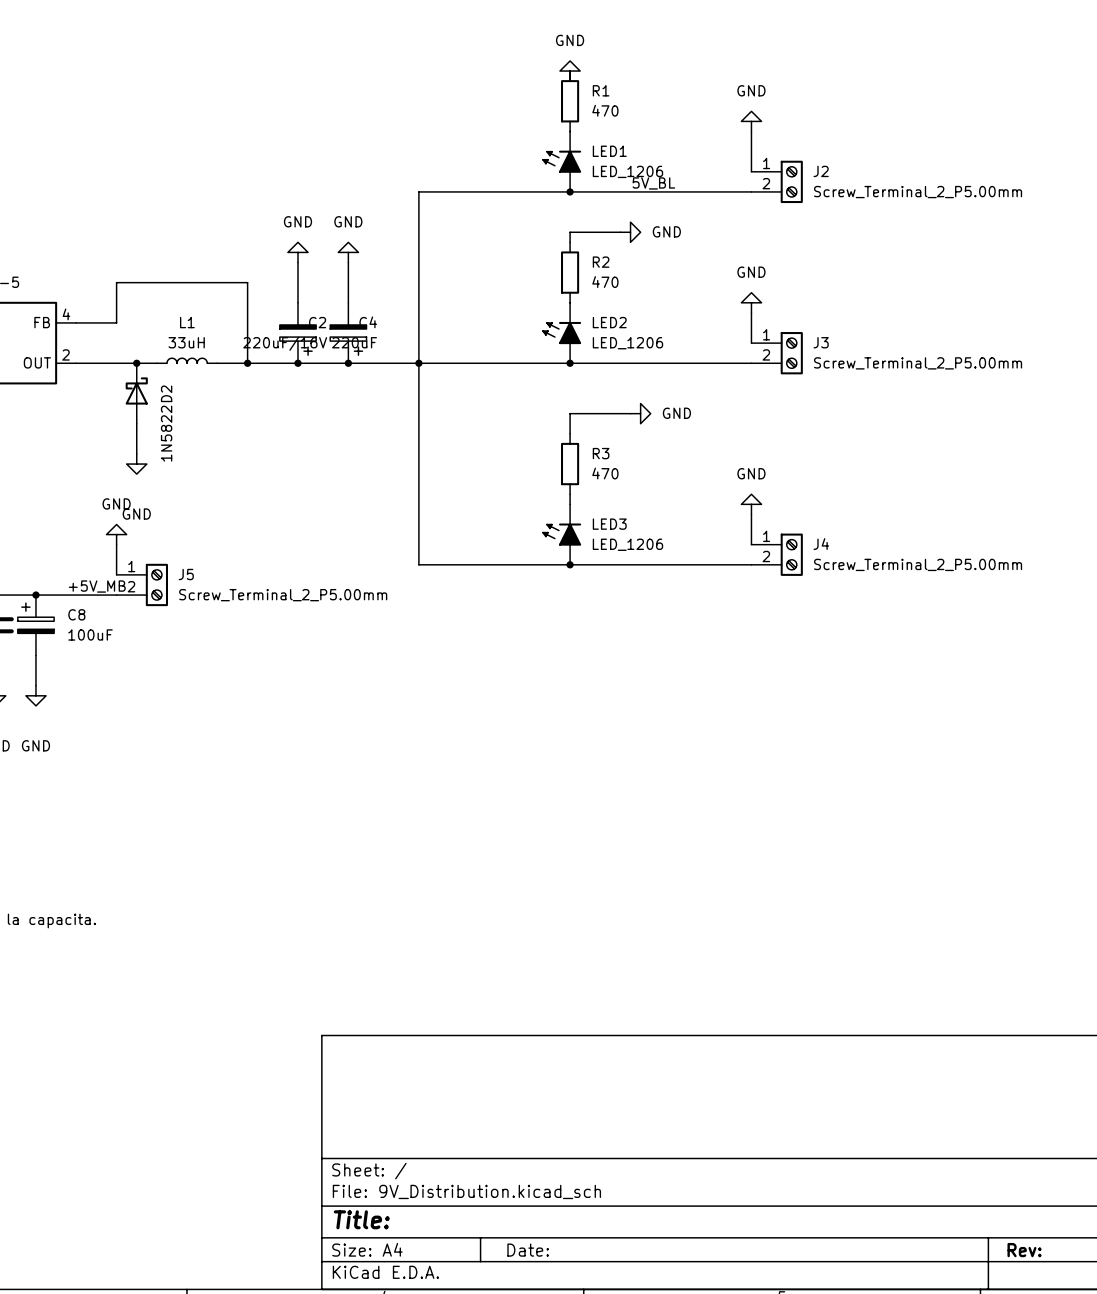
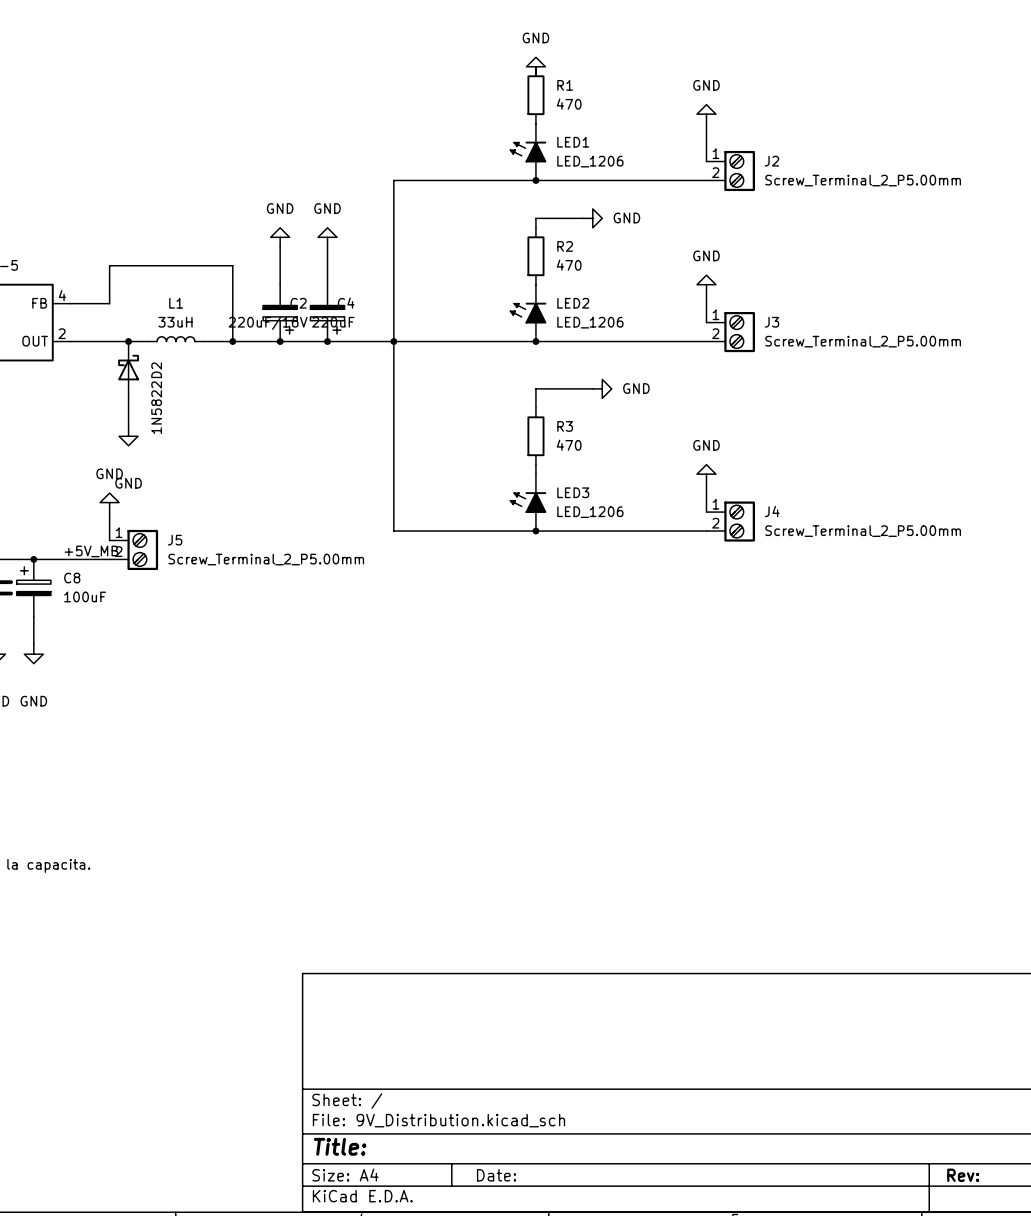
J2 symbol: [751, 160, 803, 204] -> [706, 150, 755, 192]
label: 5V_BL (653, 183) -> none
J3 symbol: [751, 332, 803, 375] -> [706, 311, 755, 353]
J4 symbol: [751, 533, 803, 576] -> [706, 501, 755, 542]
J5 symbol: [116, 563, 168, 607] -> [109, 529, 159, 571]

